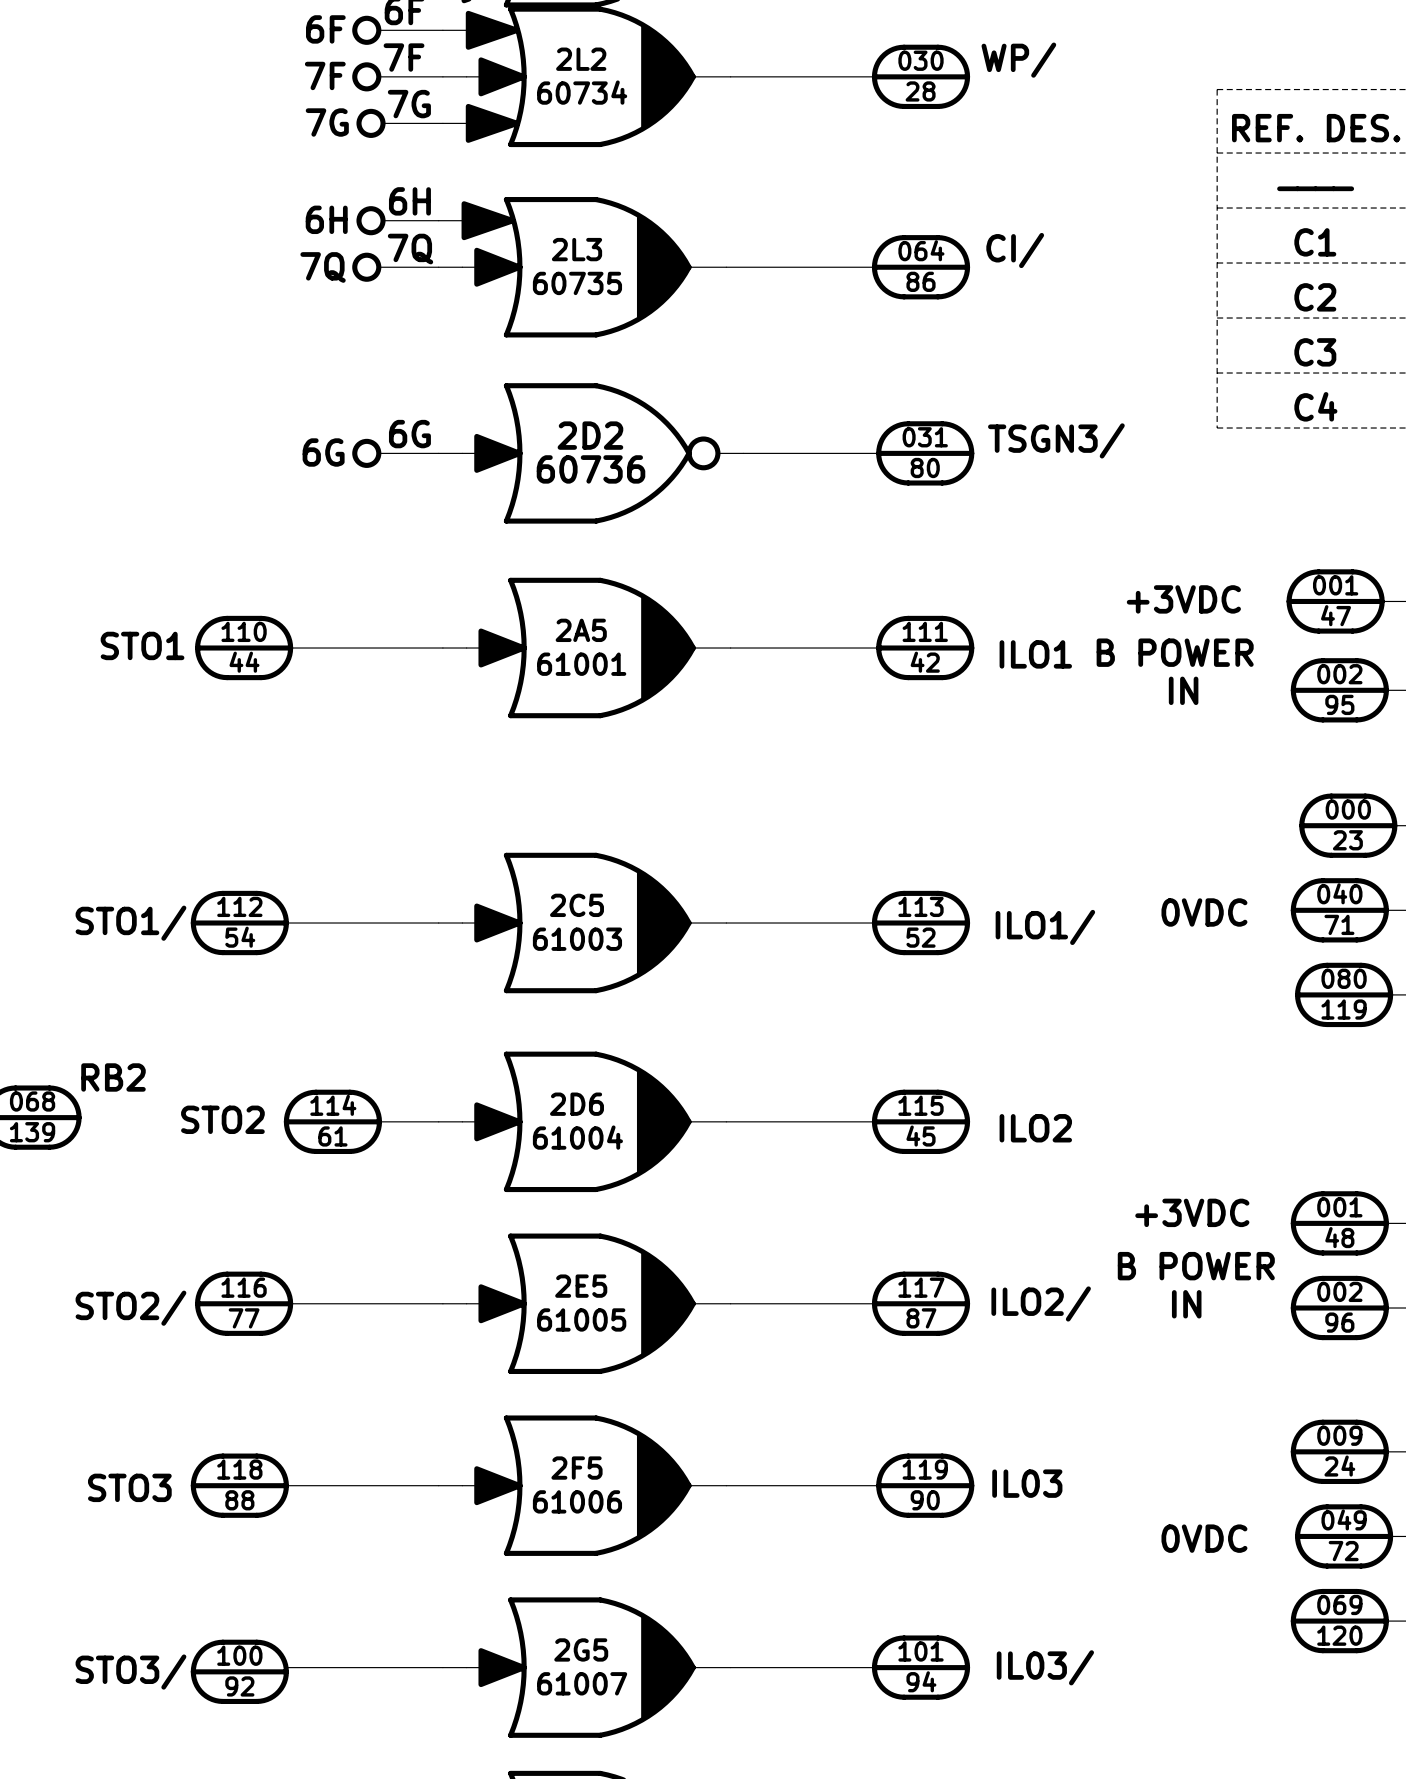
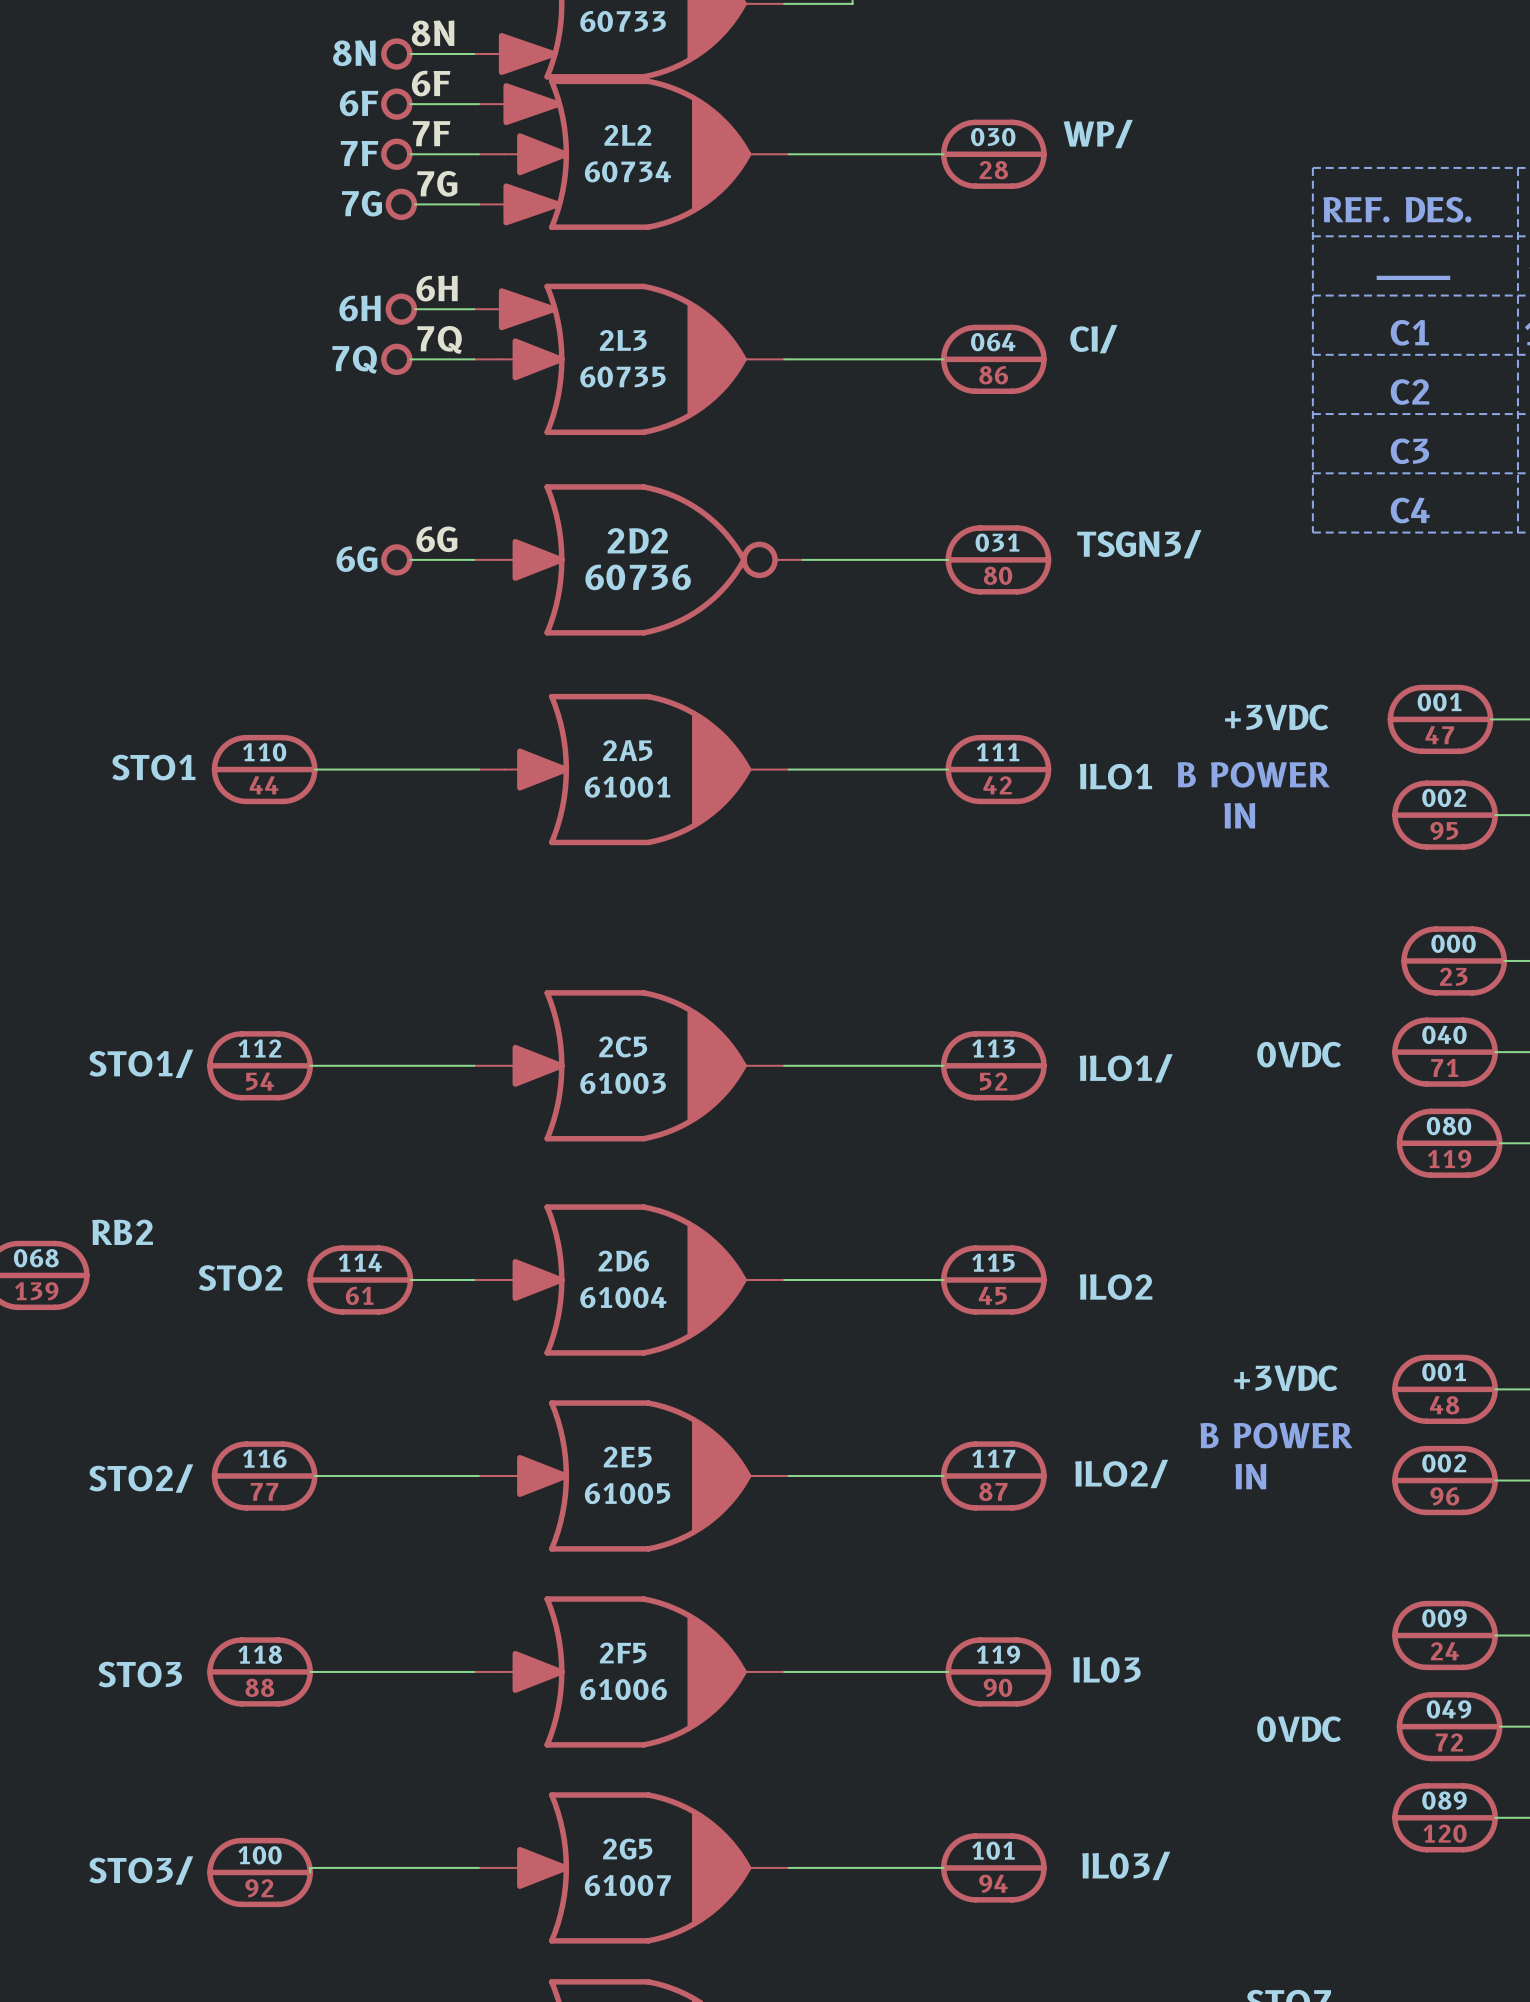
part text: 069 (1339, 1604) -> 089 (1444, 1800)

